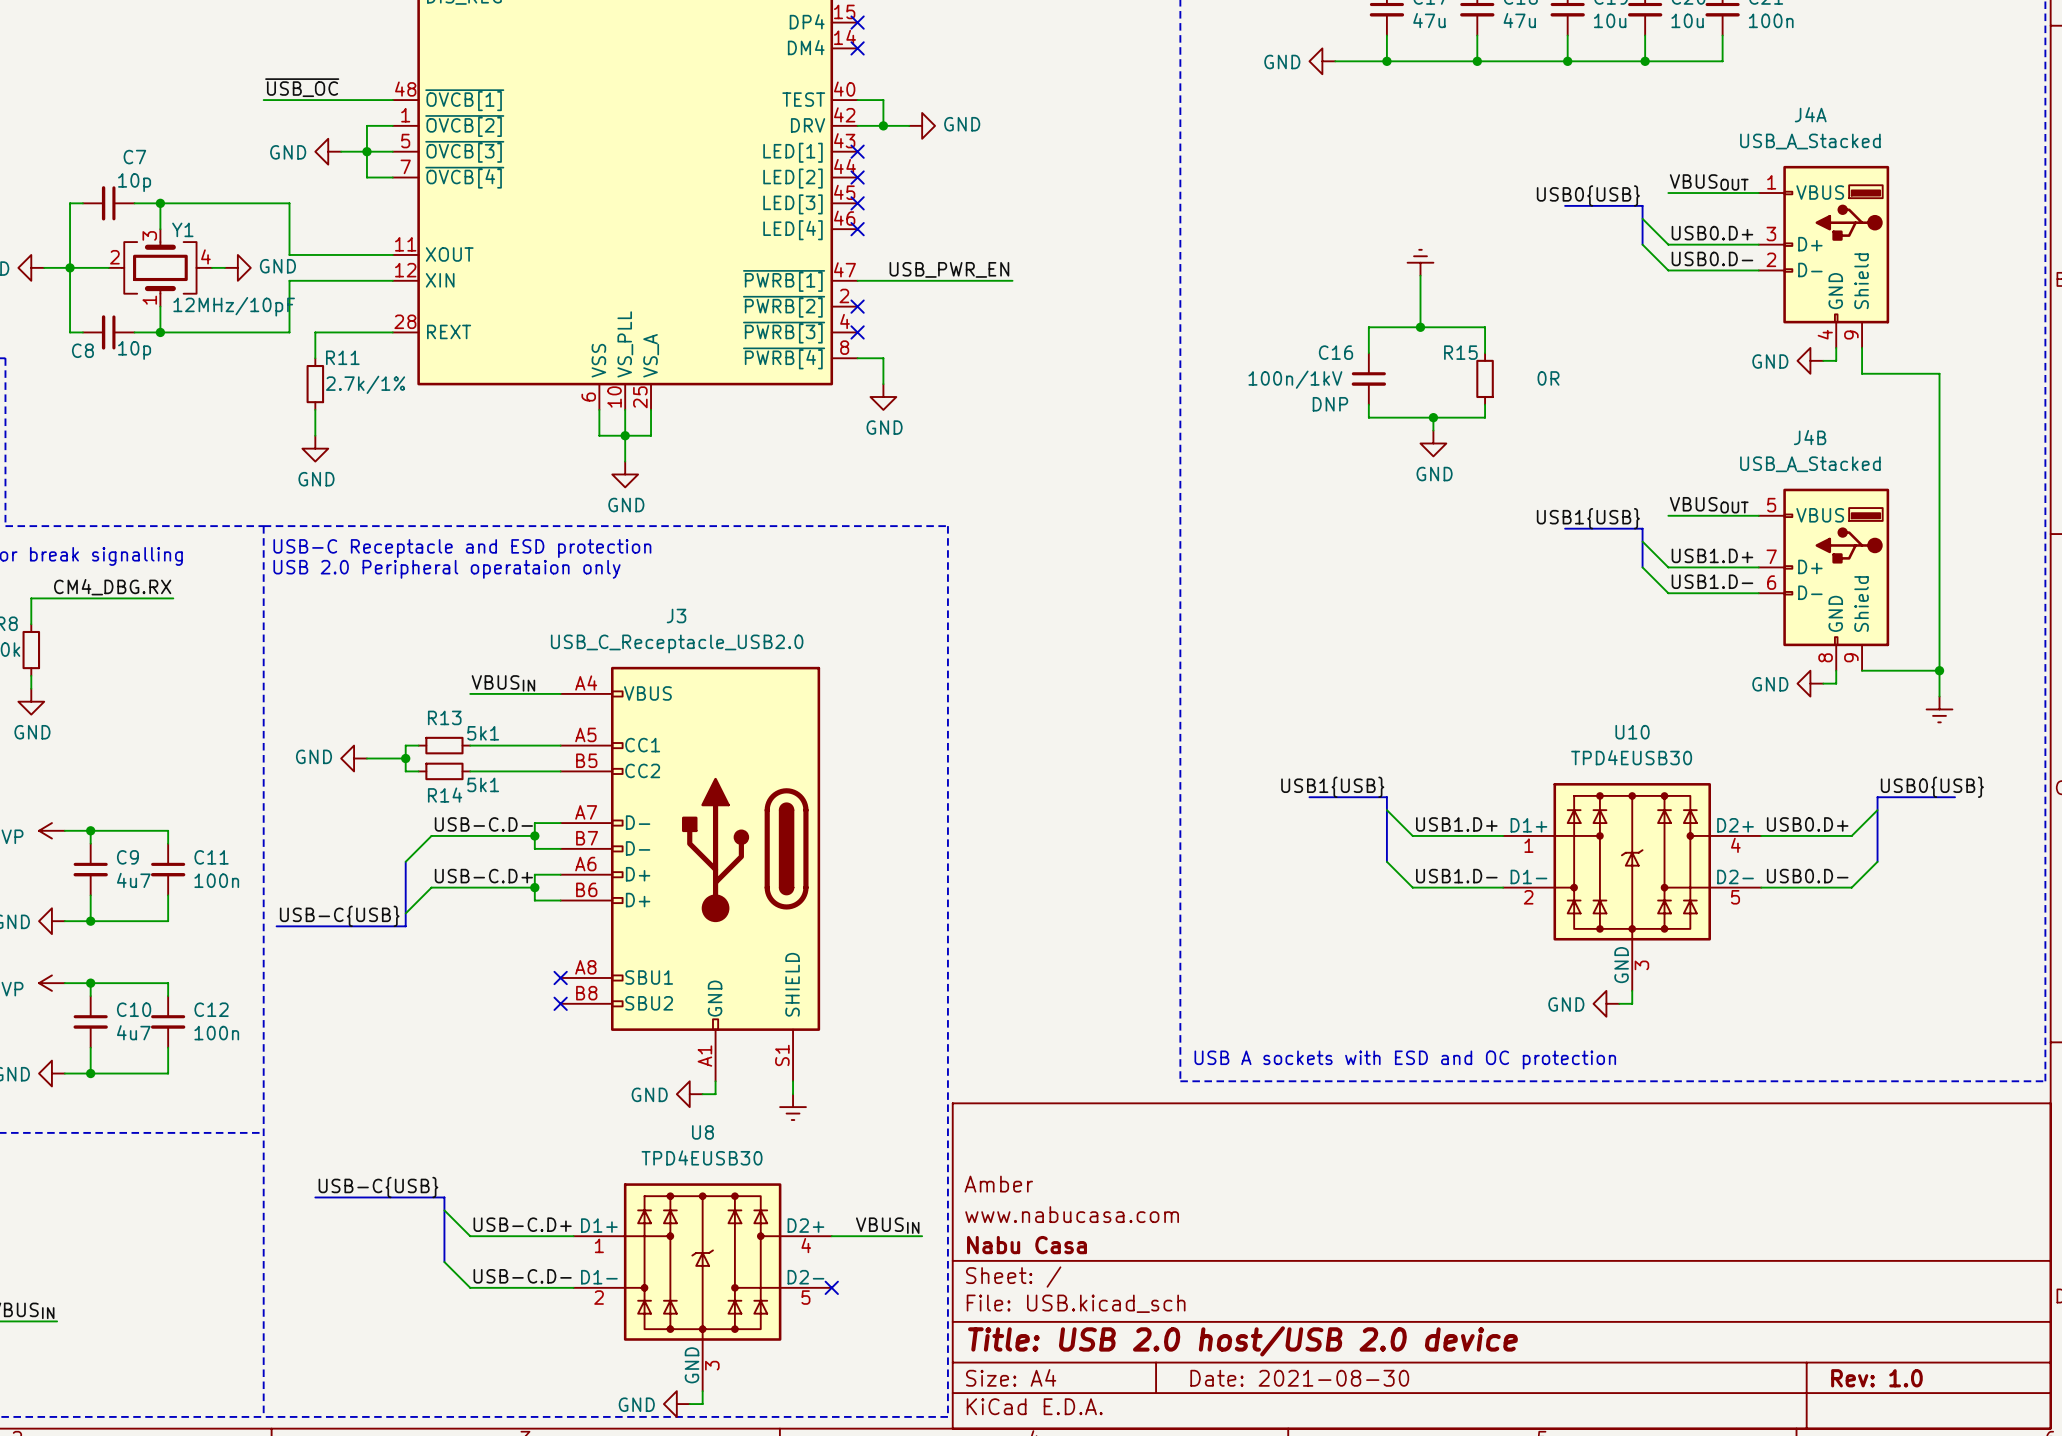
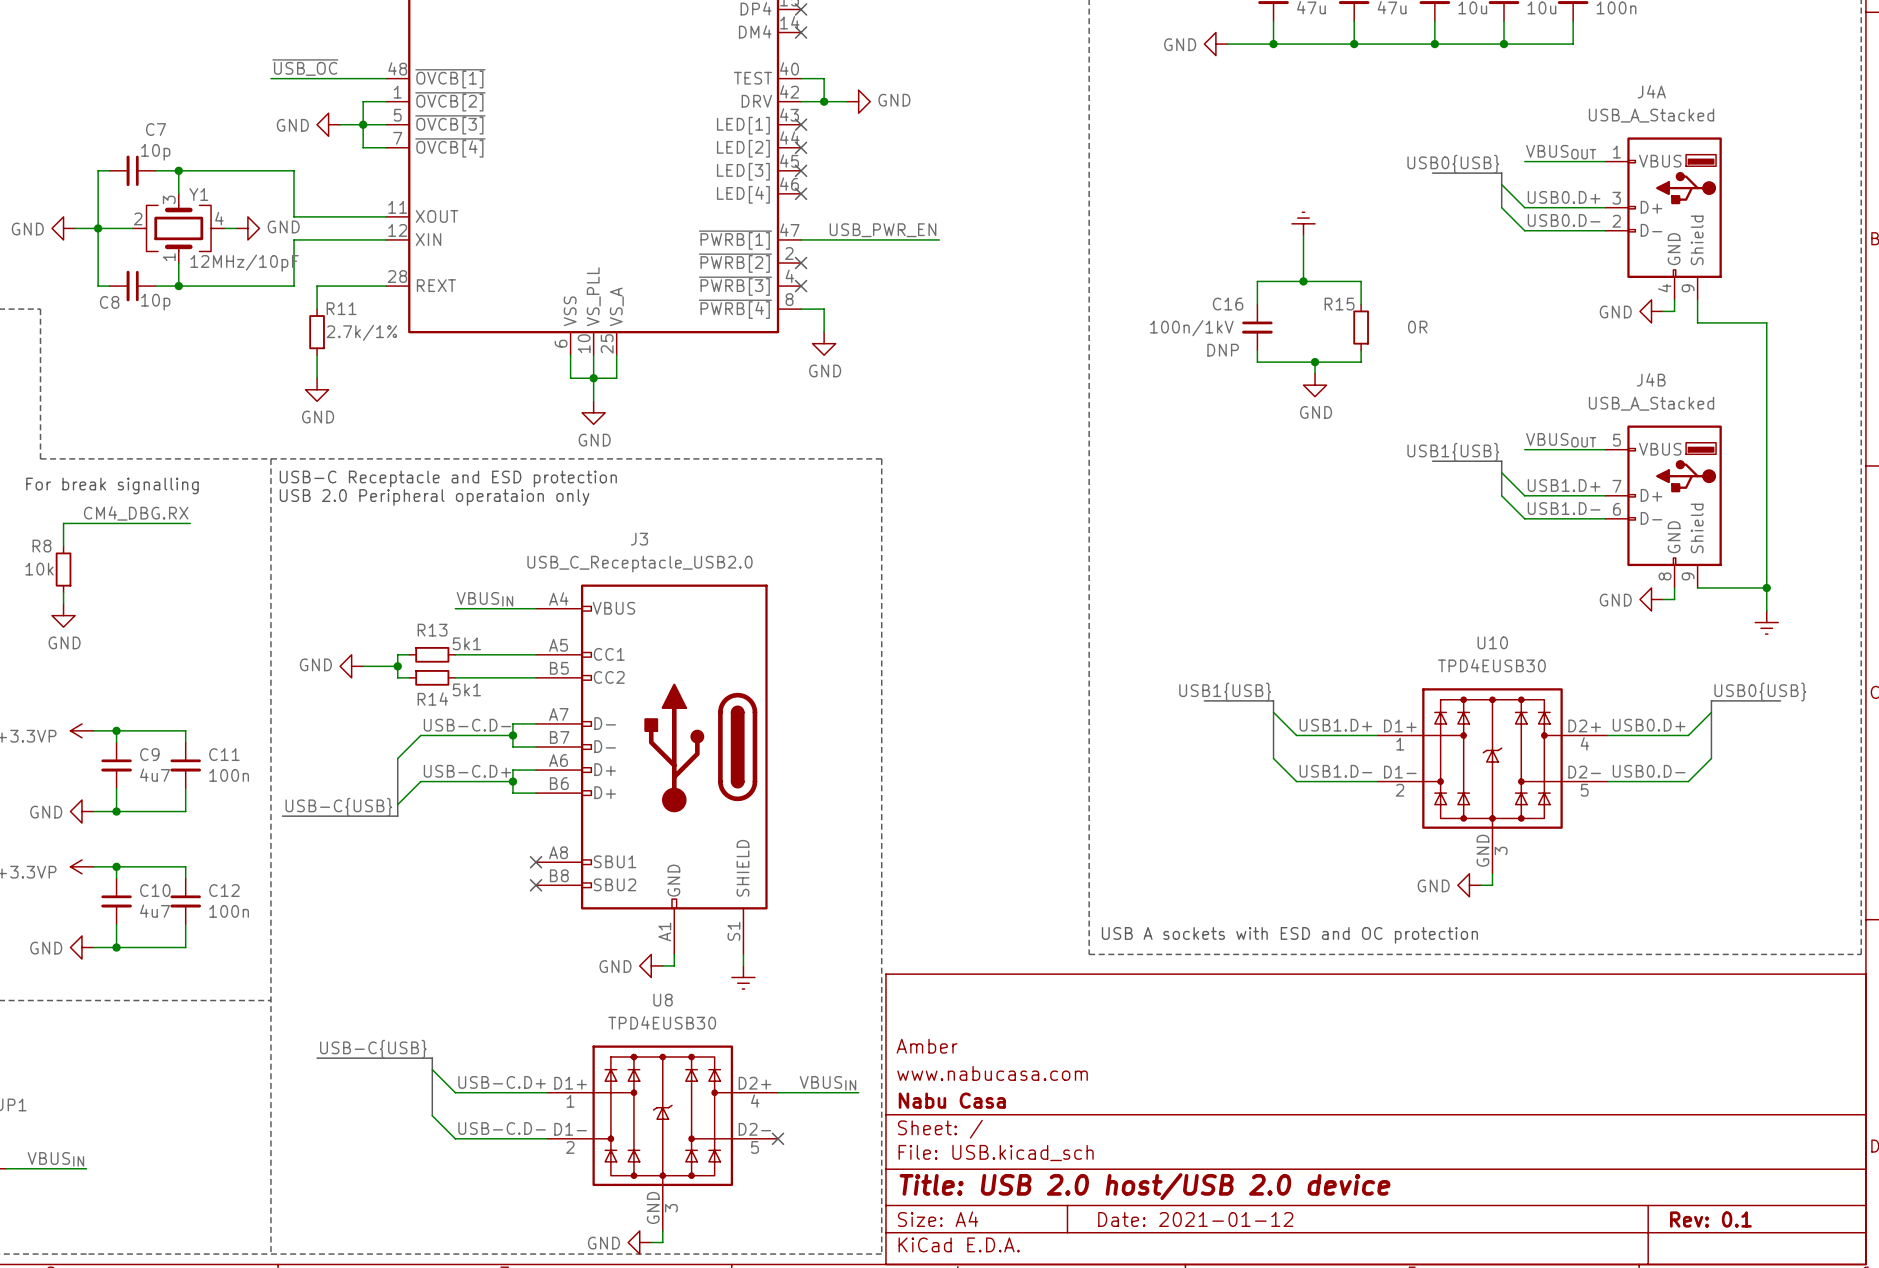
title block: Date: 2021-08-30 (1299, 1378) -> Date: 2021-01-12 (1195, 1219)
title block: Rev: 1.0 (1876, 1378) -> Rev: 0.1 (1710, 1219)

